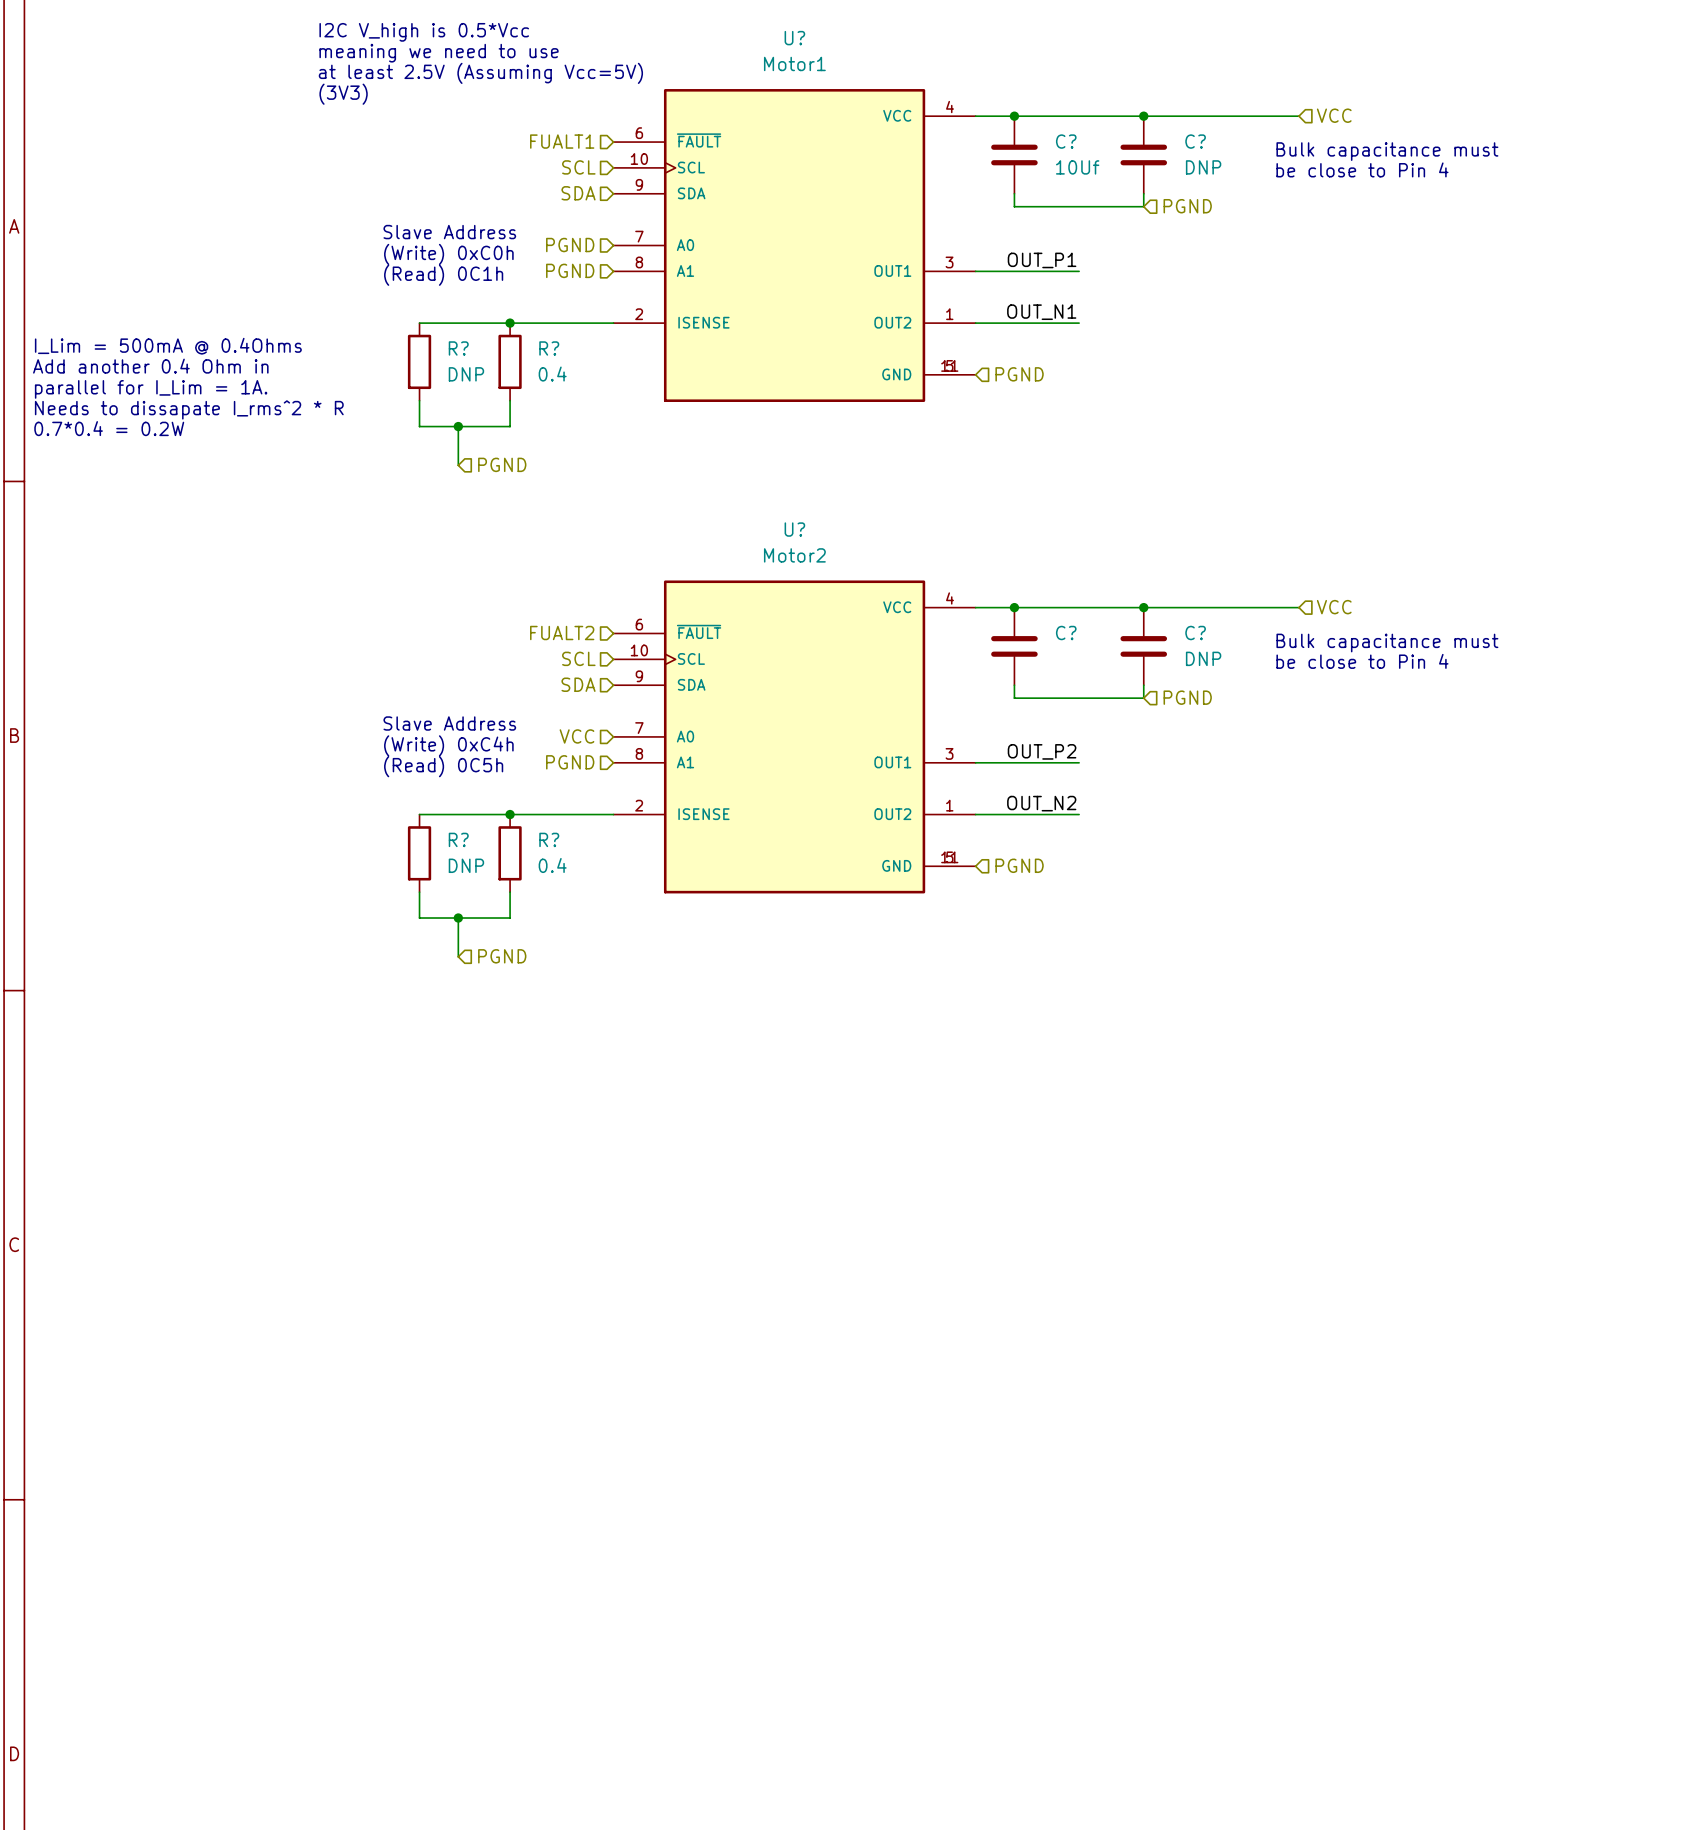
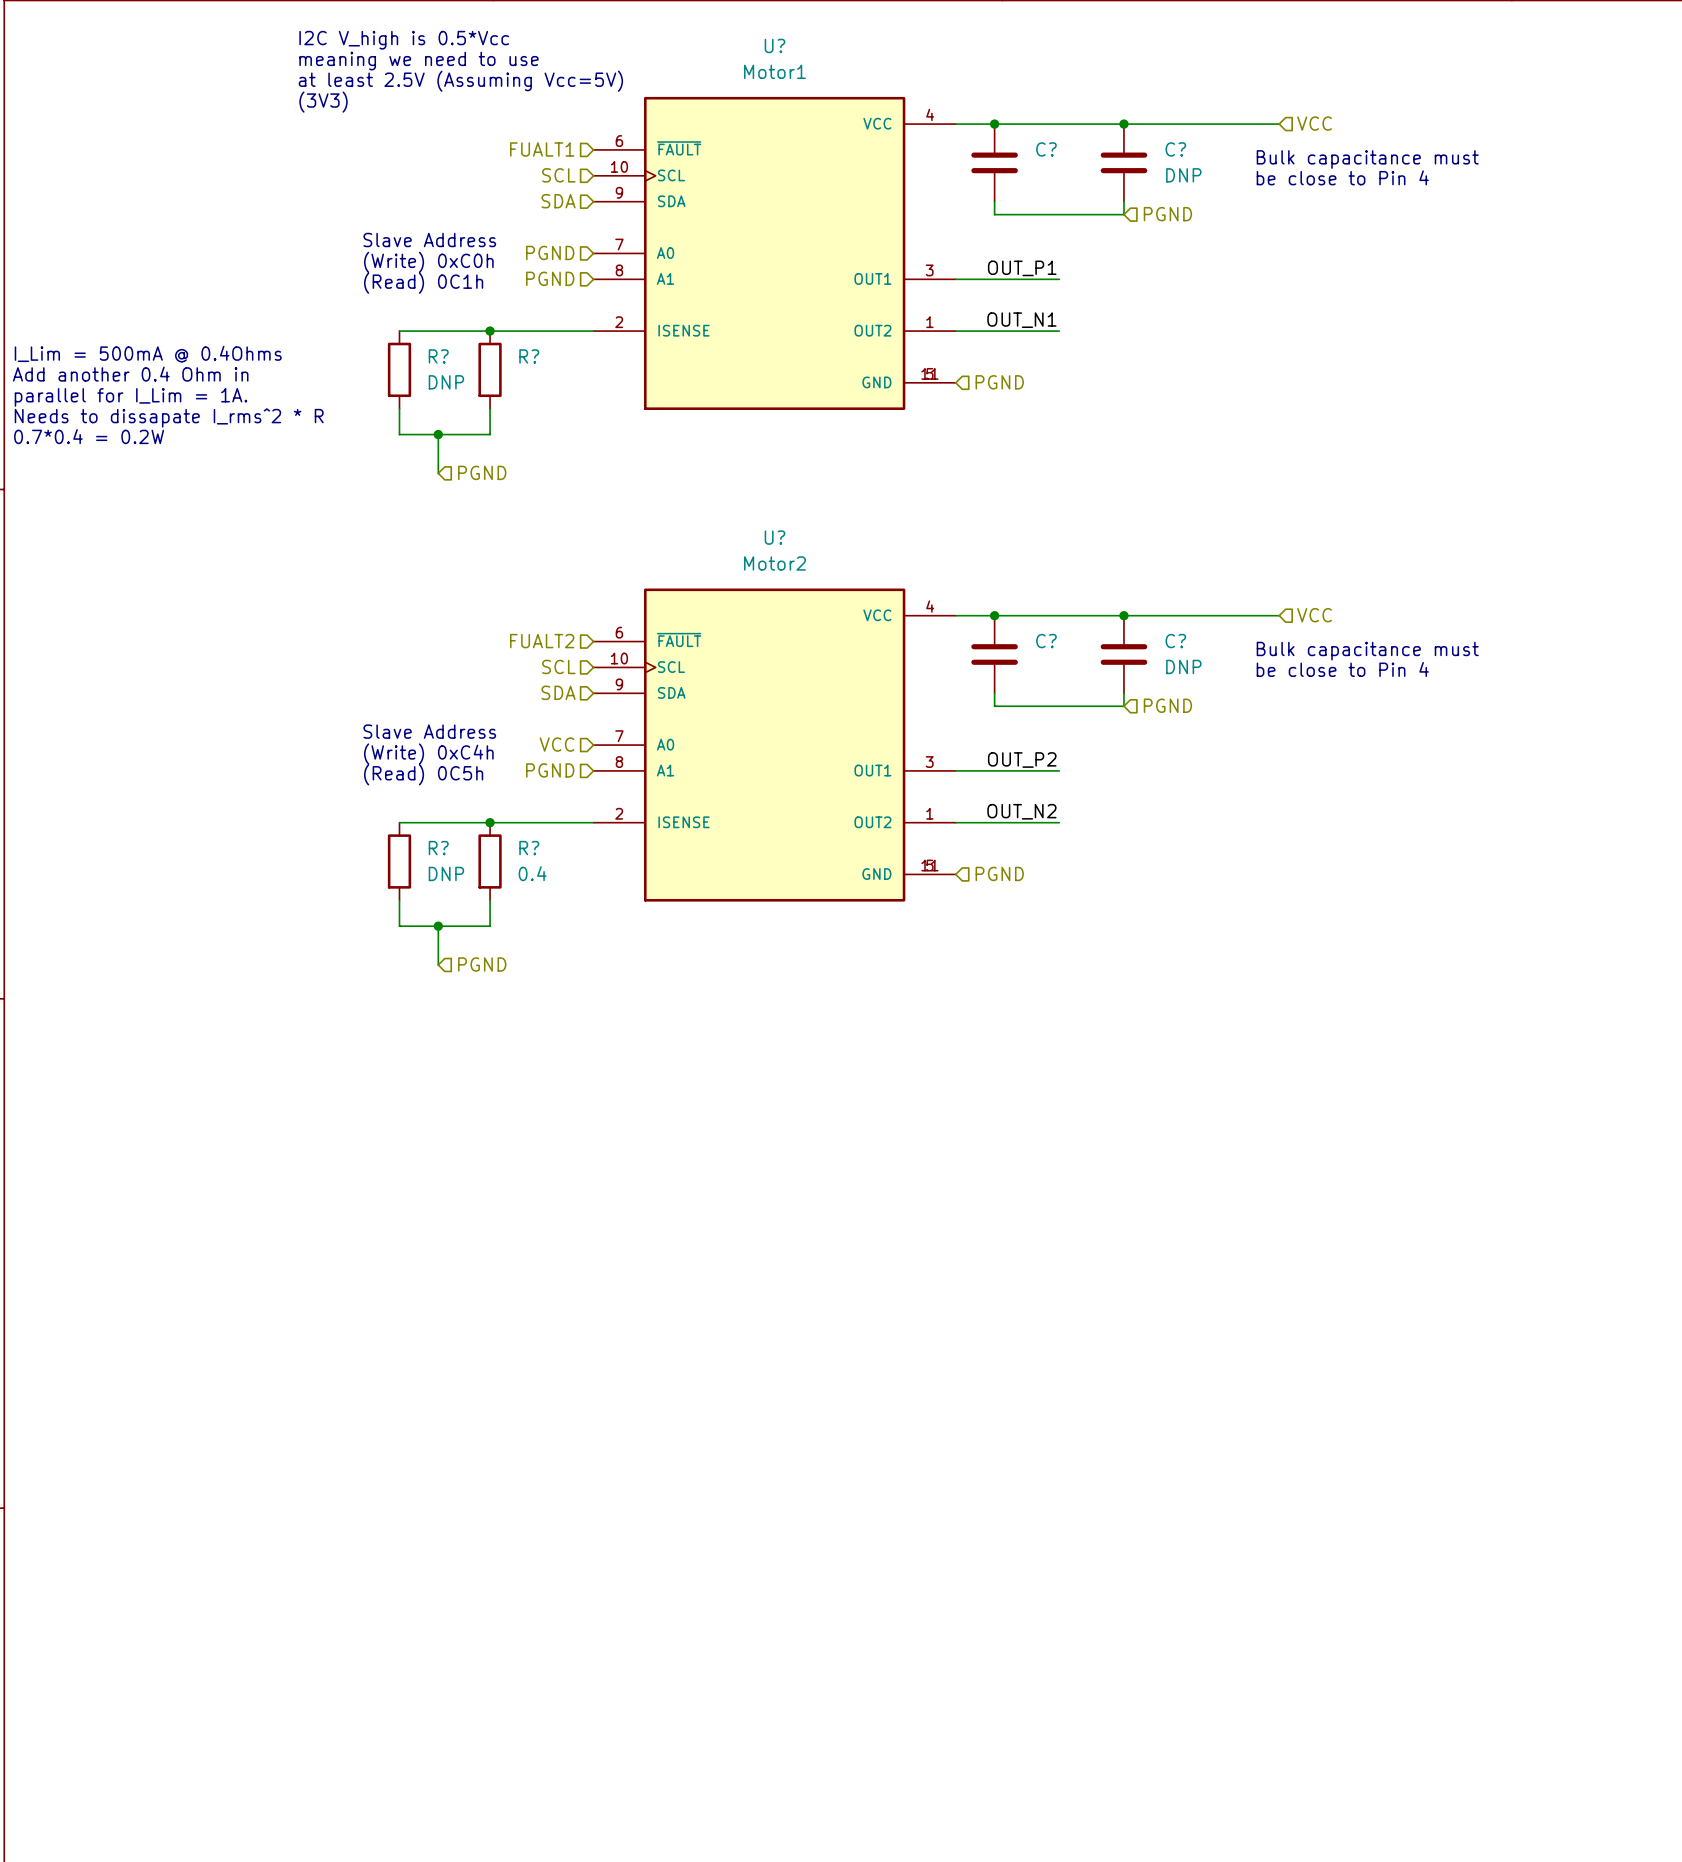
C? value: 10Uf (1077, 167) -> none
R? value: 0.4 (552, 374) -> none

